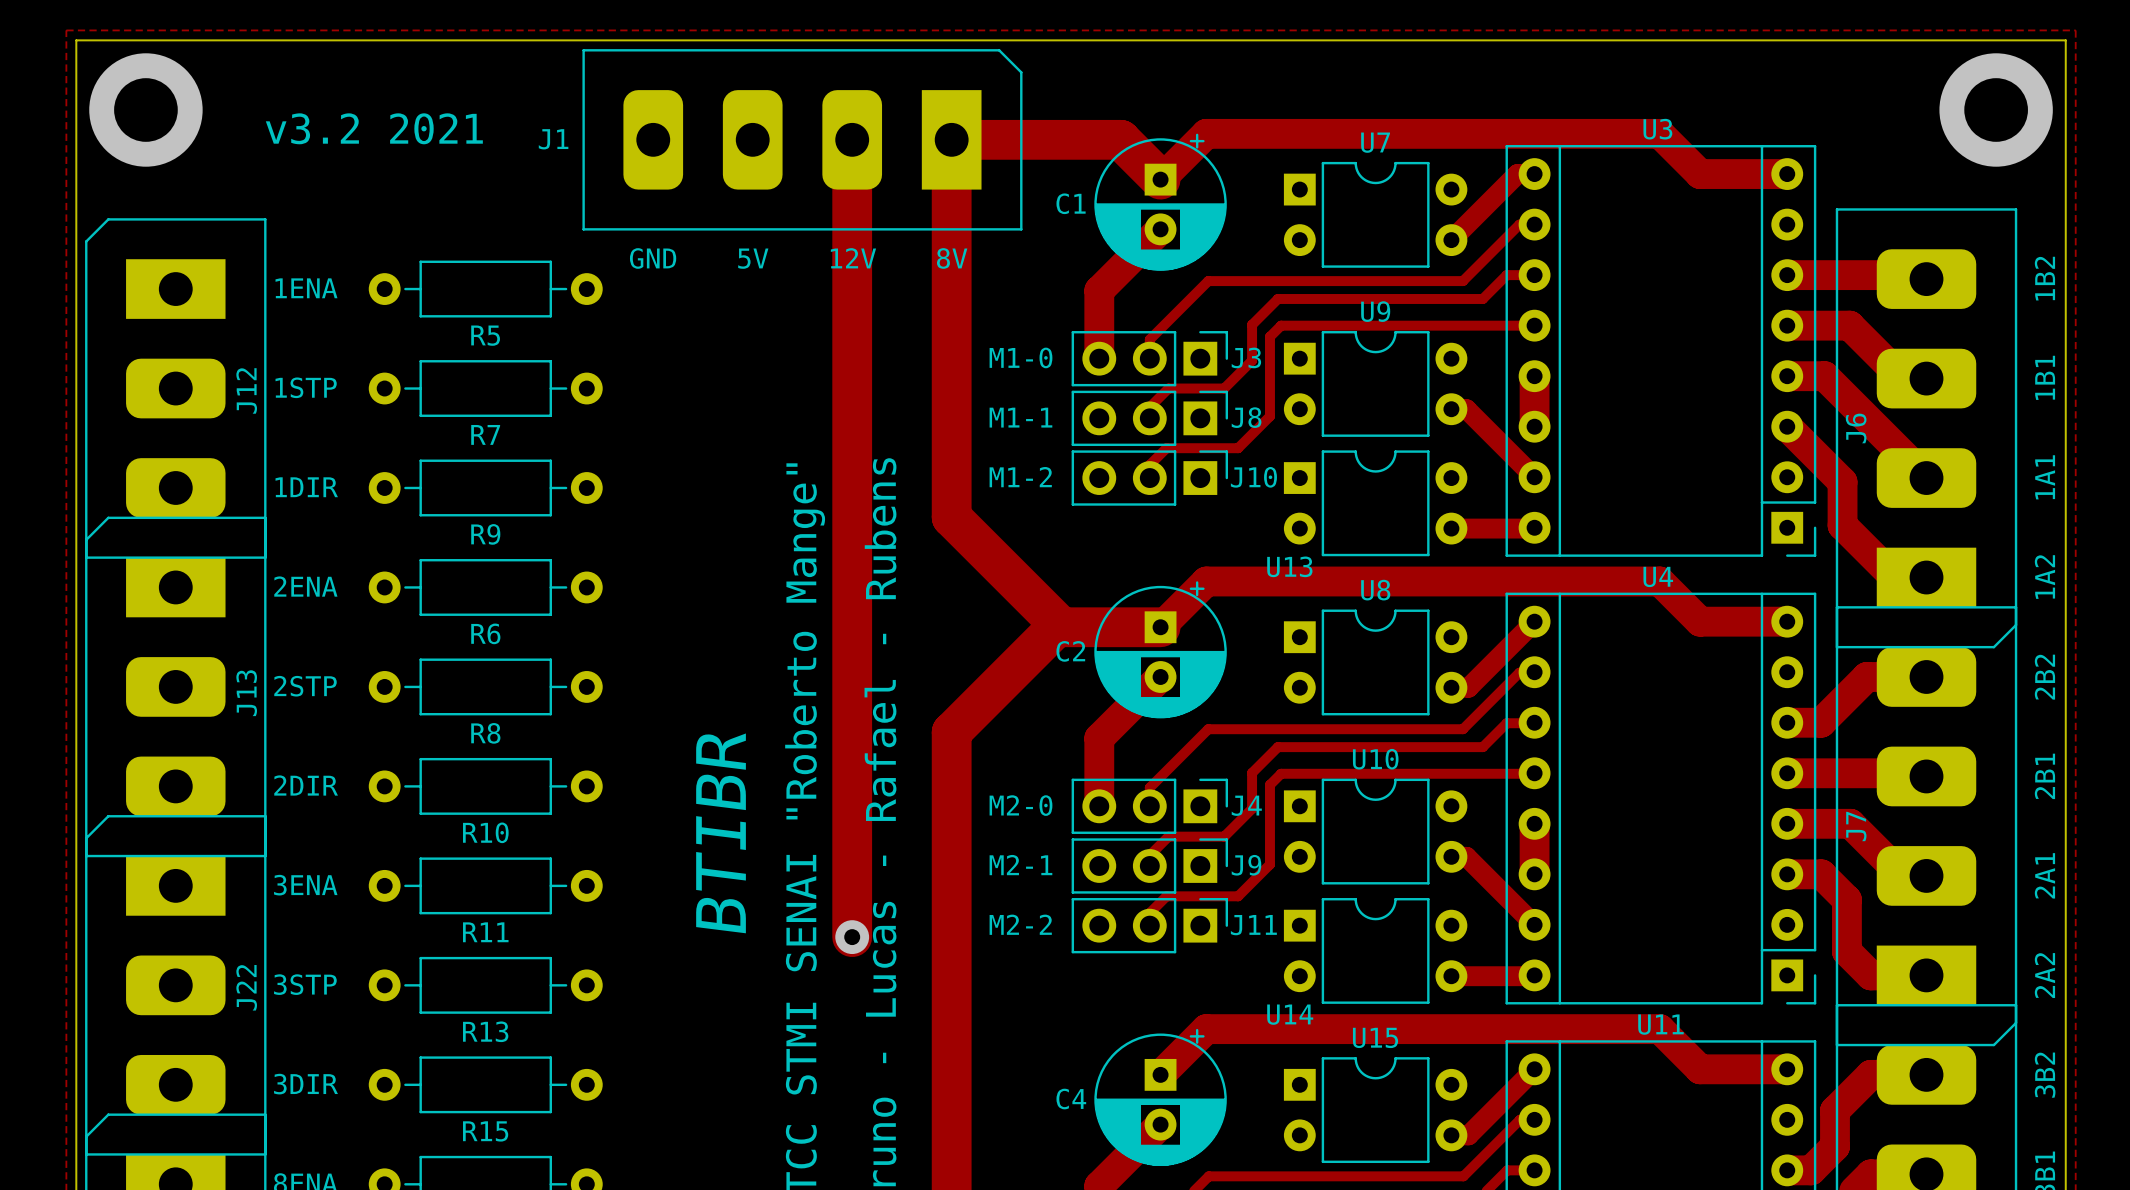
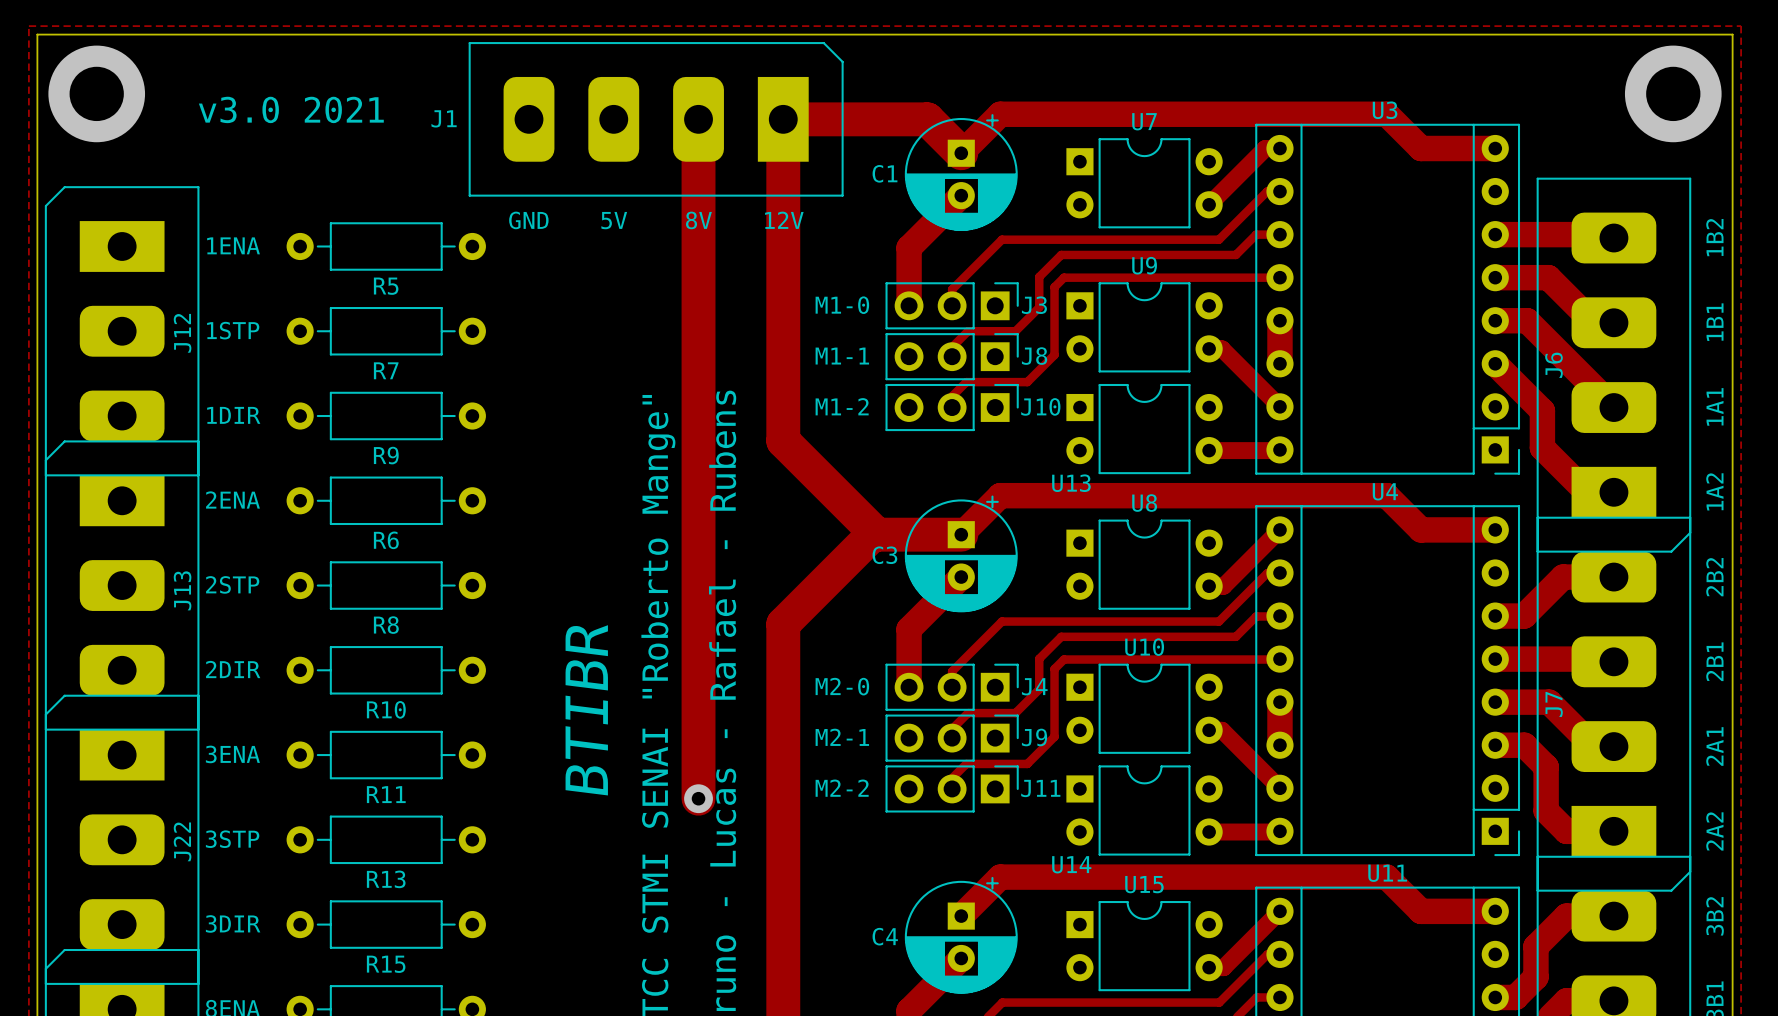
text: v3.2 2021 (374, 128) -> v3.0 2021 (291, 109)
text: 12V (853, 258) -> 8V (698, 220)
text: 8V (952, 258) -> 12V (784, 220)
C2 name: C2 (1070, 651) -> C3 (884, 555)

